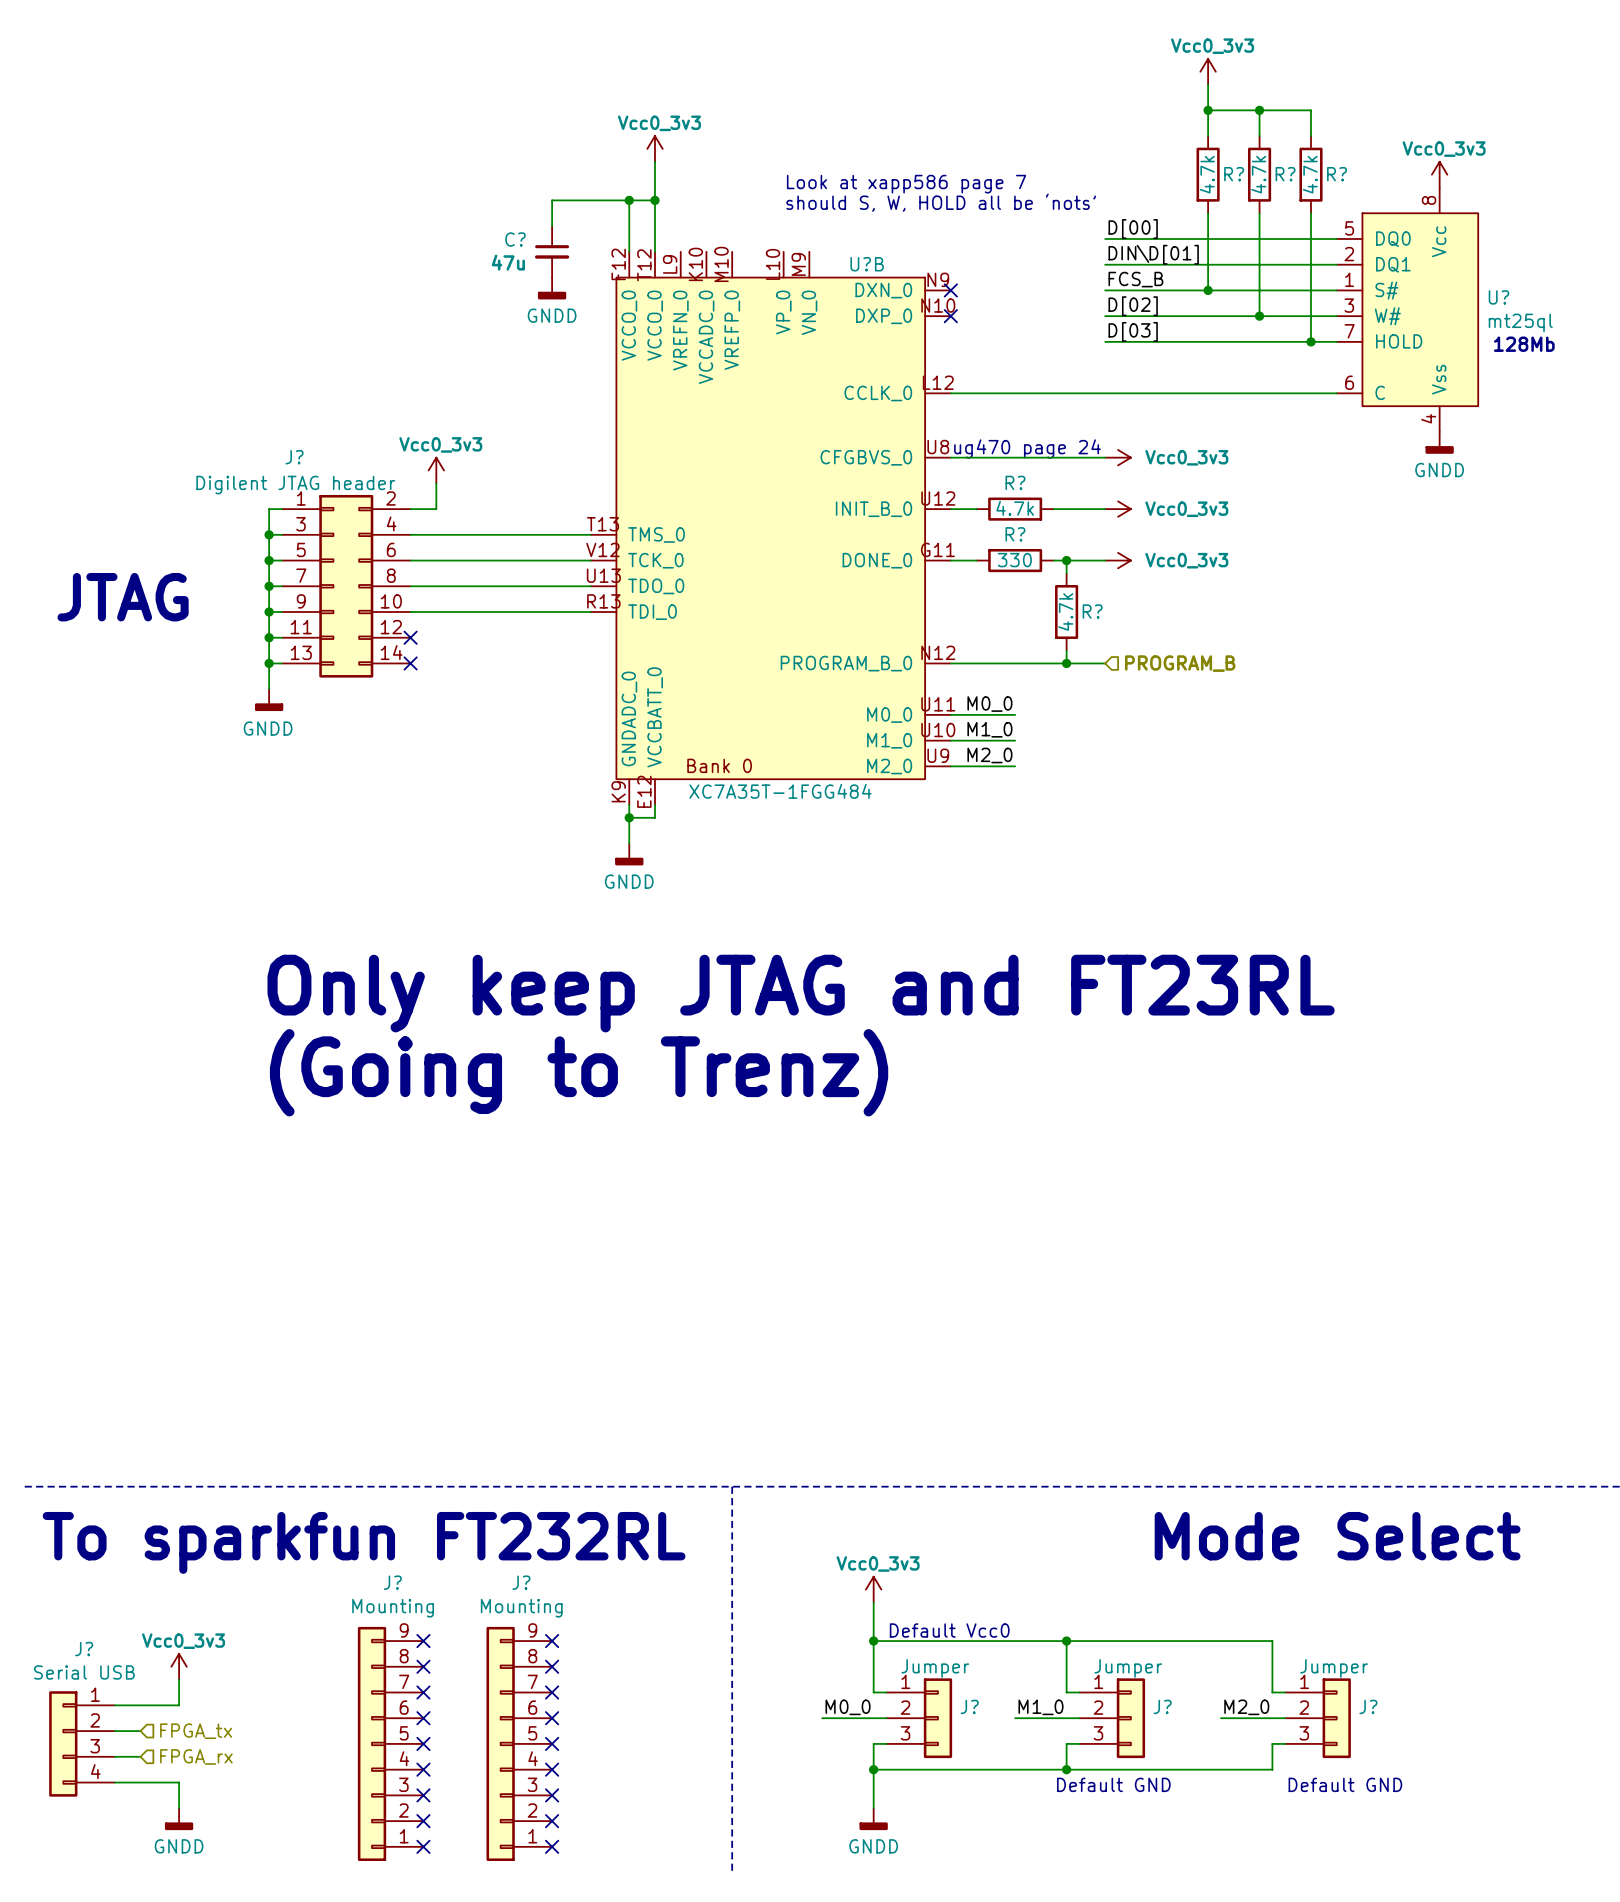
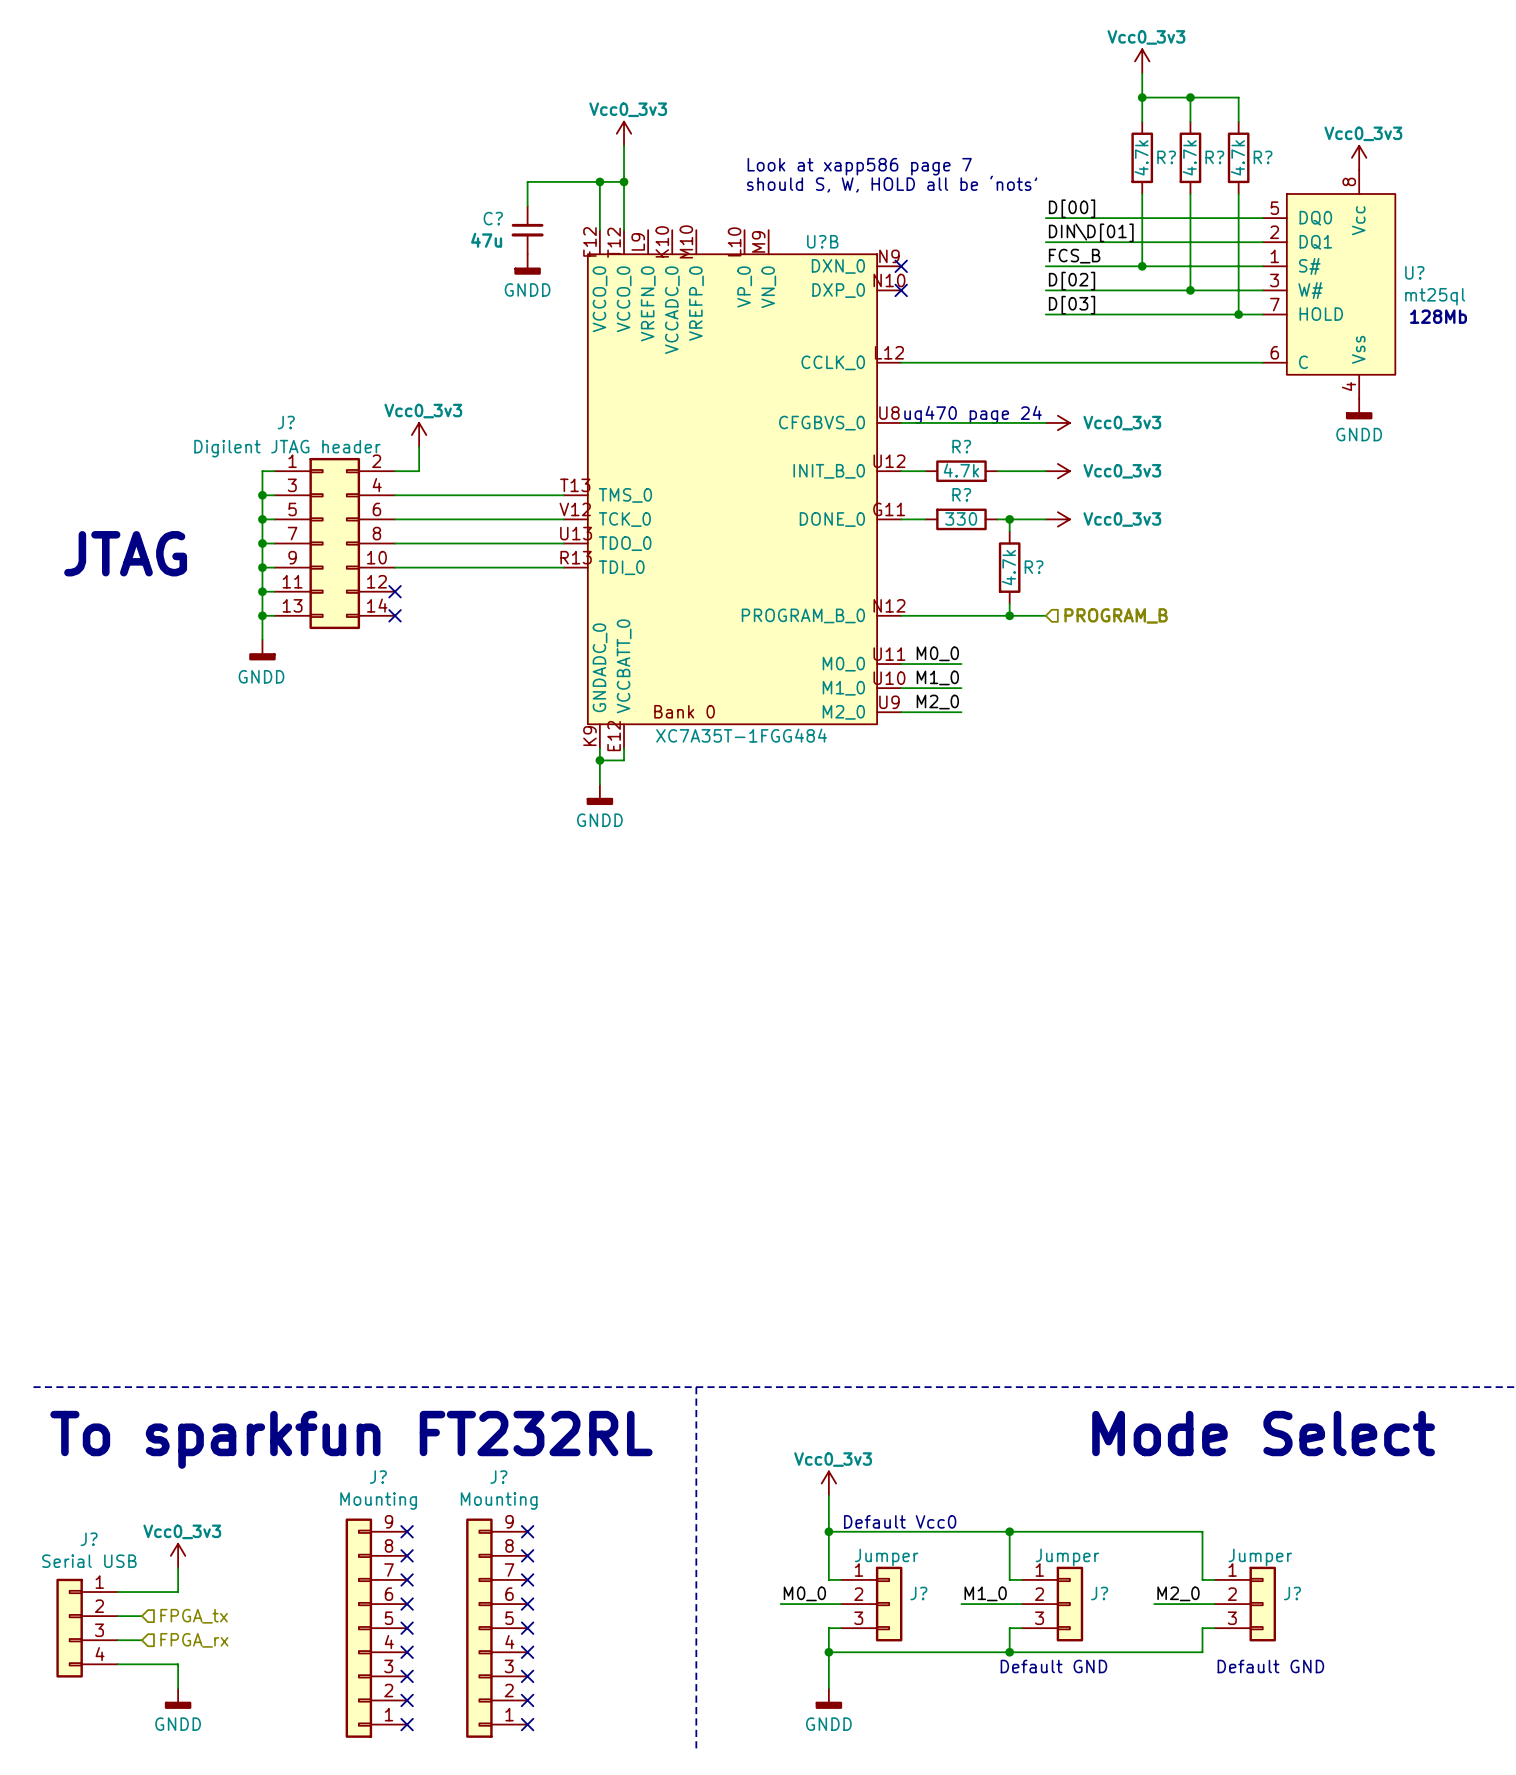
text: Only keep JTAG and FT23RL (801, 993) -> none
text: (Going to Trenz) (579, 1072) -> none

